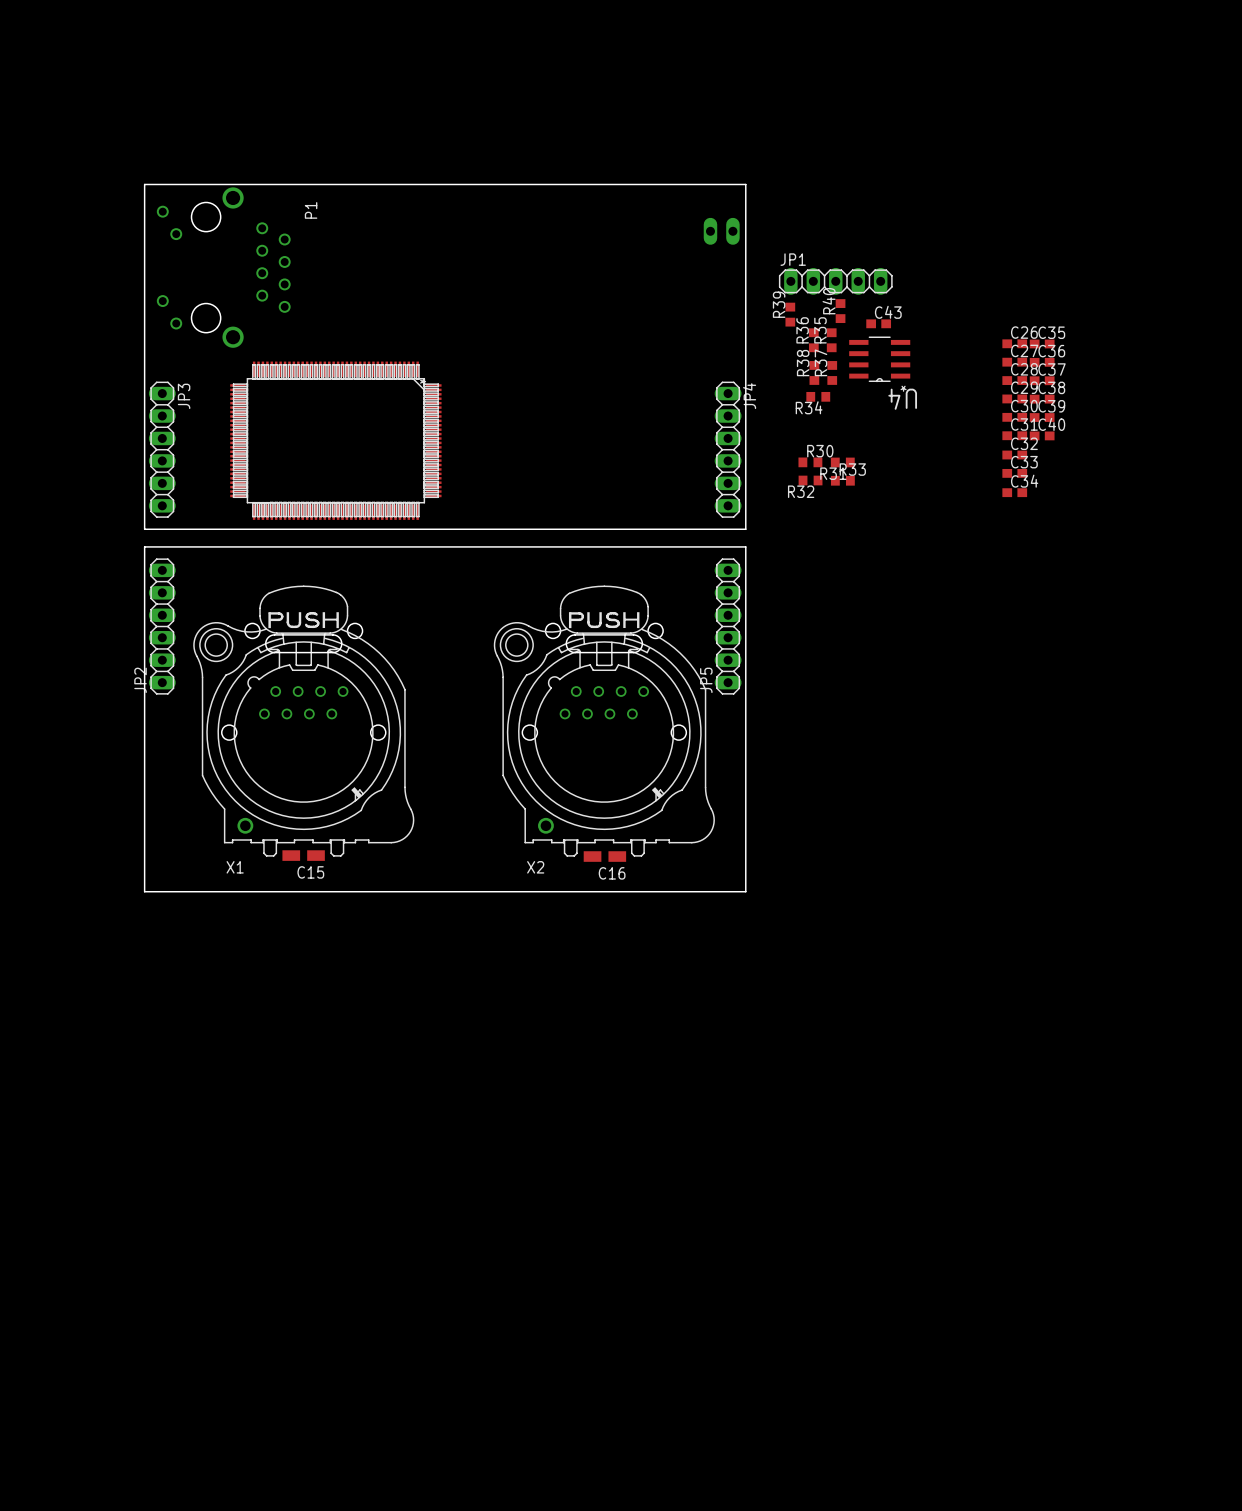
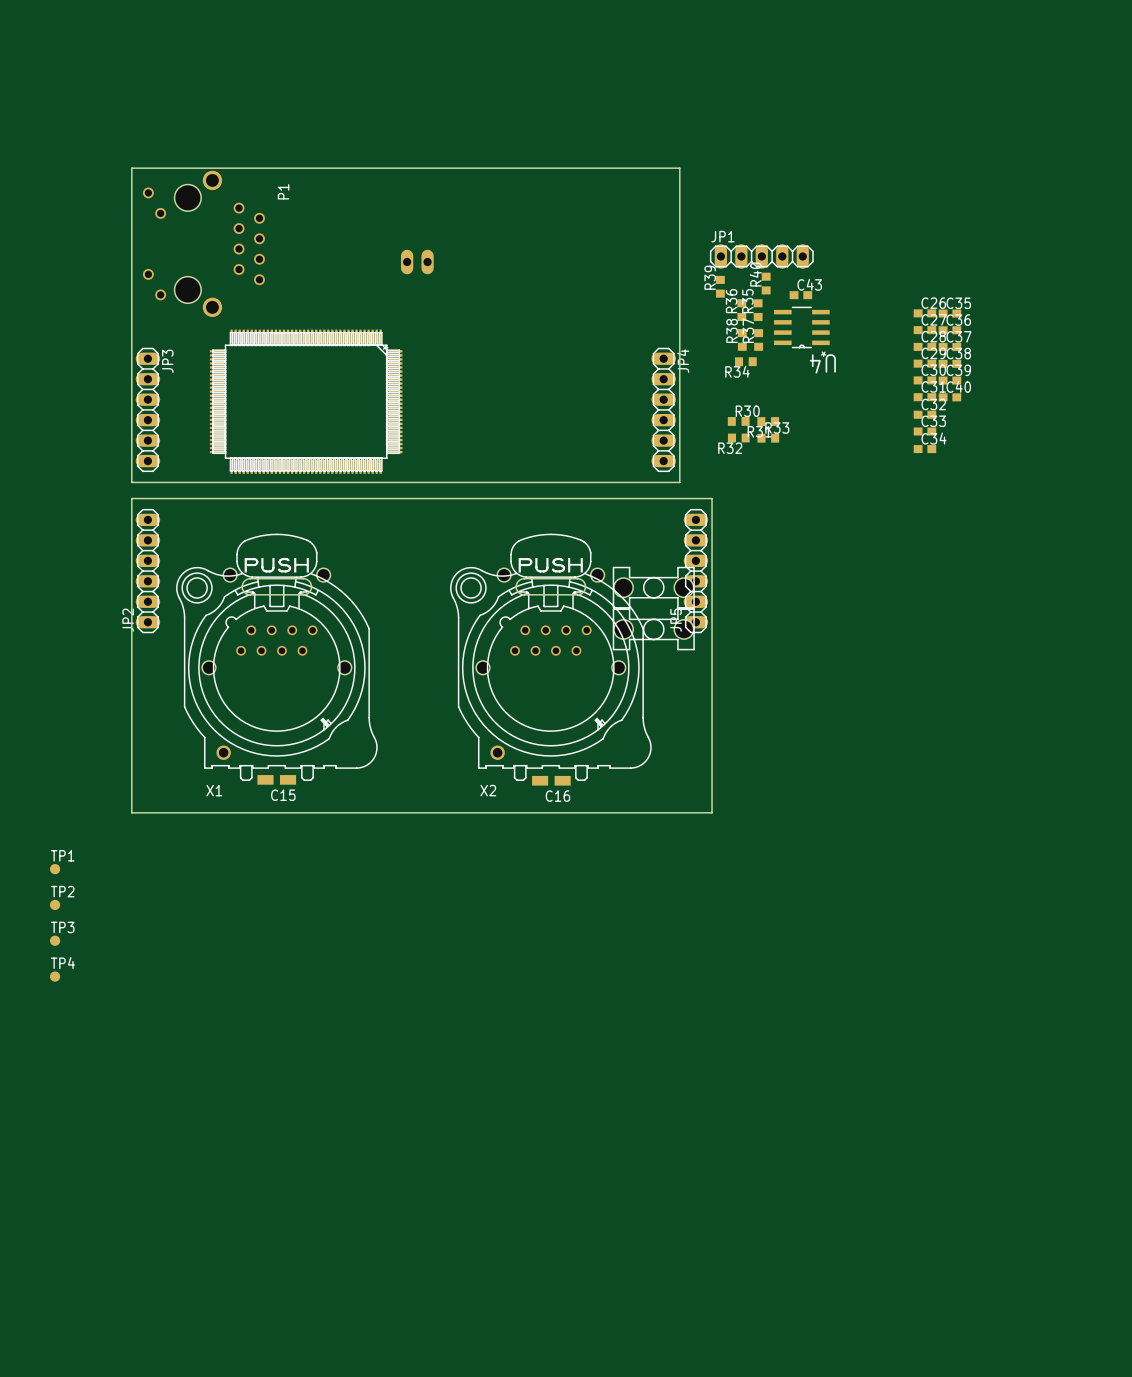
part: (721, 231) -> none
part: none -> (417, 262)
board edge: (745, 546) (745, 891) -> (679, 498) (712, 498) (712, 812) (679, 812)
JP5 position: (728, 626) -> (695, 571)
part: none -> (653, 587)
part: none -> (653, 629)
TP1: none -> (55, 869)
TP2: none -> (55, 904)
TP3: none -> (55, 940)
TP4: none -> (55, 976)

